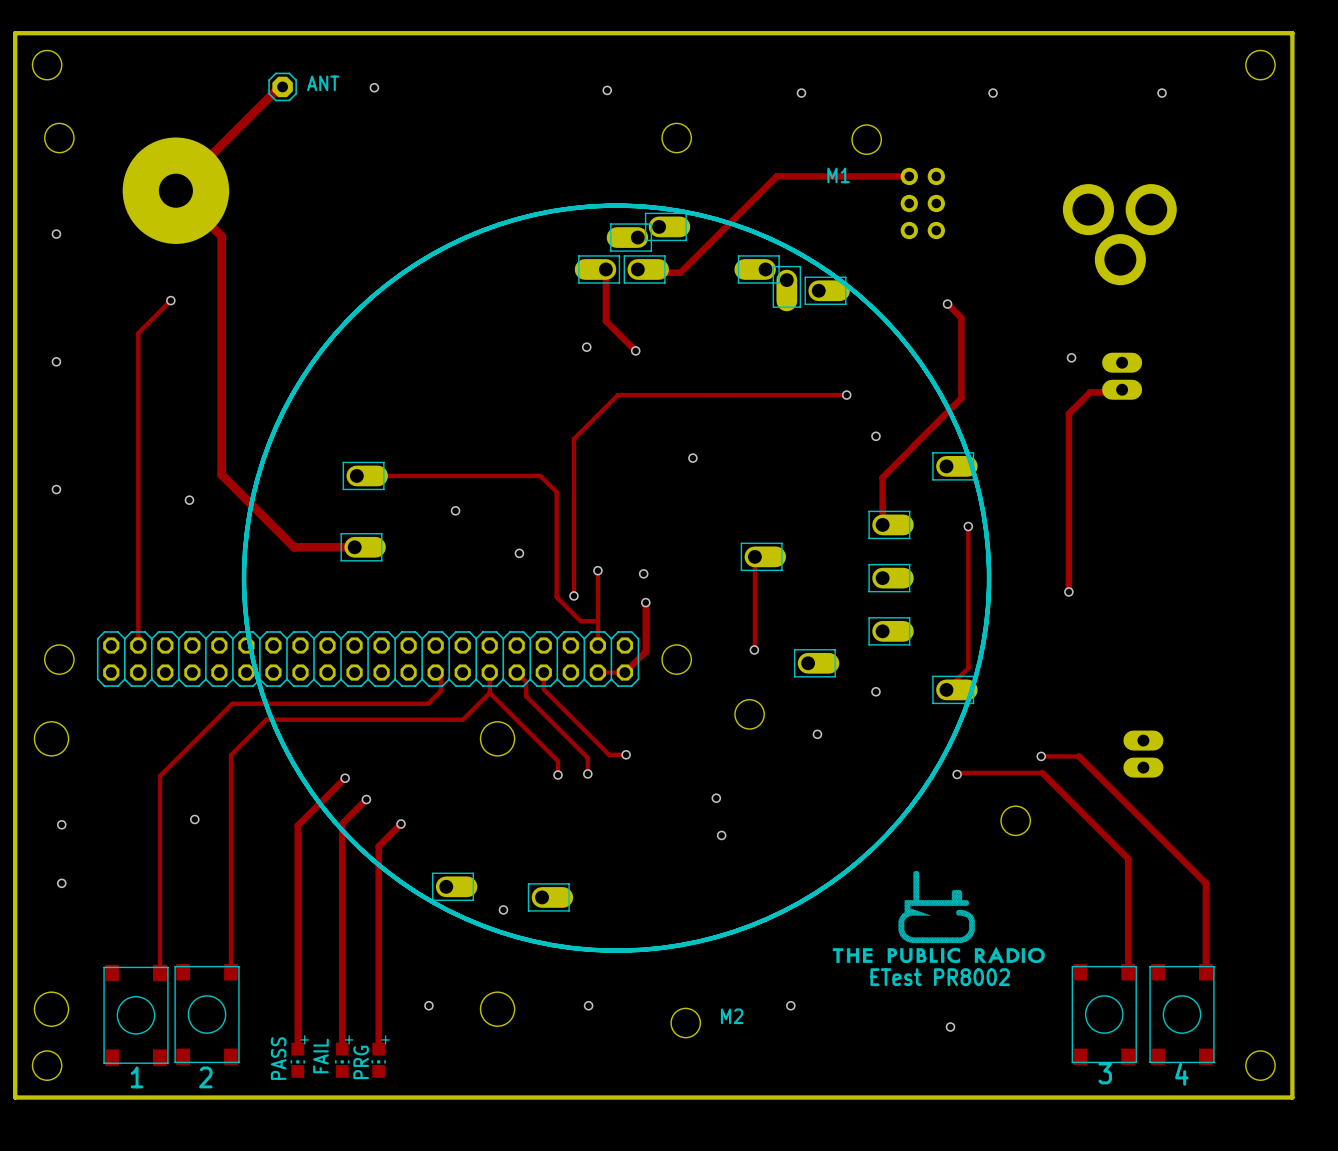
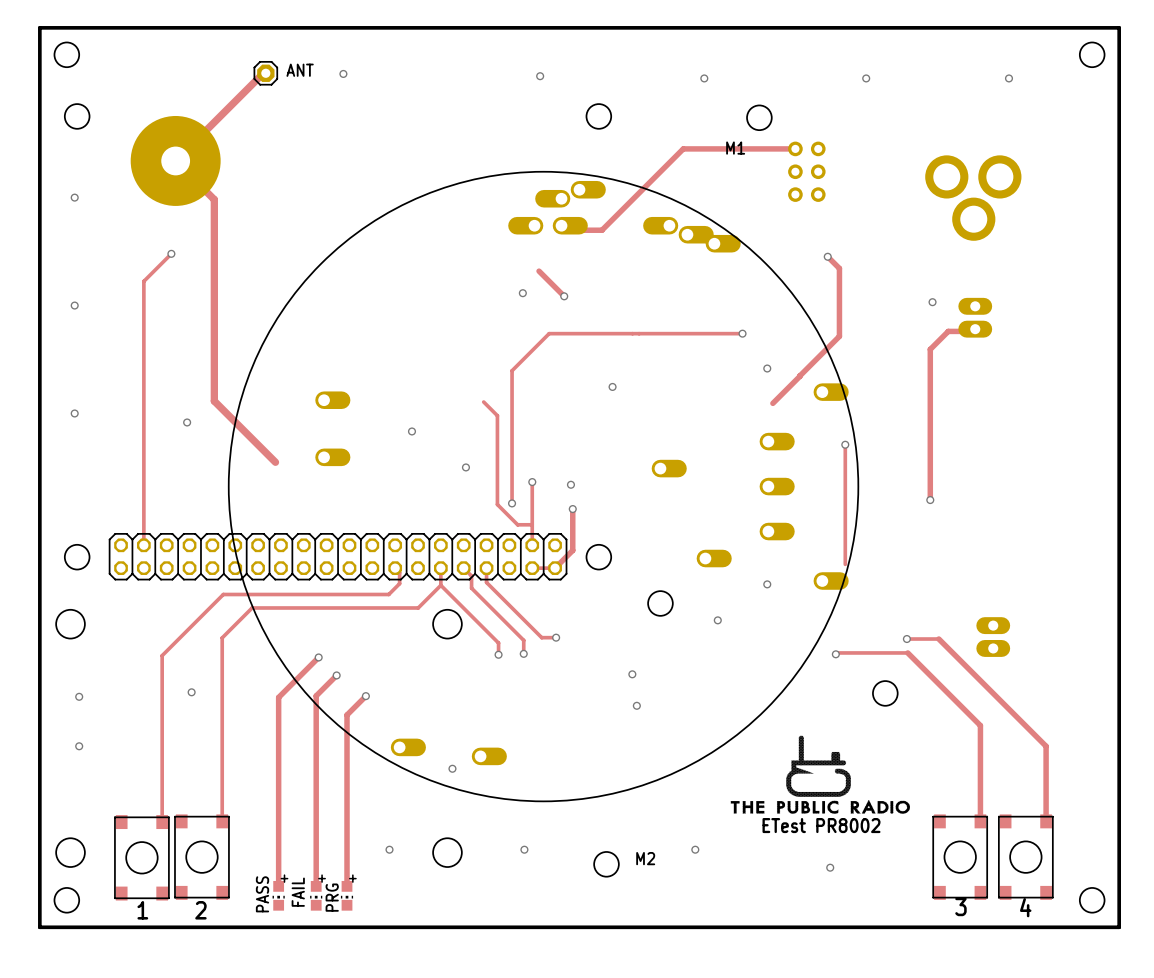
drawing: [241, 203, 992, 953] -> none
part: (667, 226) -> none
part: (629, 237) -> none
part: (597, 269) -> none
track: (605, 269) (605, 321) -> none
part: (646, 269) -> none
part: (757, 269) -> none
part: (786, 288) -> none
part: (827, 290) -> none
part: (954, 466) -> none
track: (356, 475) (540, 475) -> none
part: (365, 475) -> none
track: (882, 477) (882, 524) -> none
part: (891, 524) -> none
track: (294, 547) (354, 547) -> none
part: (363, 547) -> none
track: (754, 556) (754, 649) -> none
part: (763, 556) -> none
part: none -> (543, 486)
part: (891, 578) -> none
part: (891, 631) -> none
via: (754, 649) -> none
part: (816, 663) -> none
track: (968, 668) (946, 689) -> none
part: (954, 689) -> none
part: (454, 886) -> none
part: (550, 897) -> none

